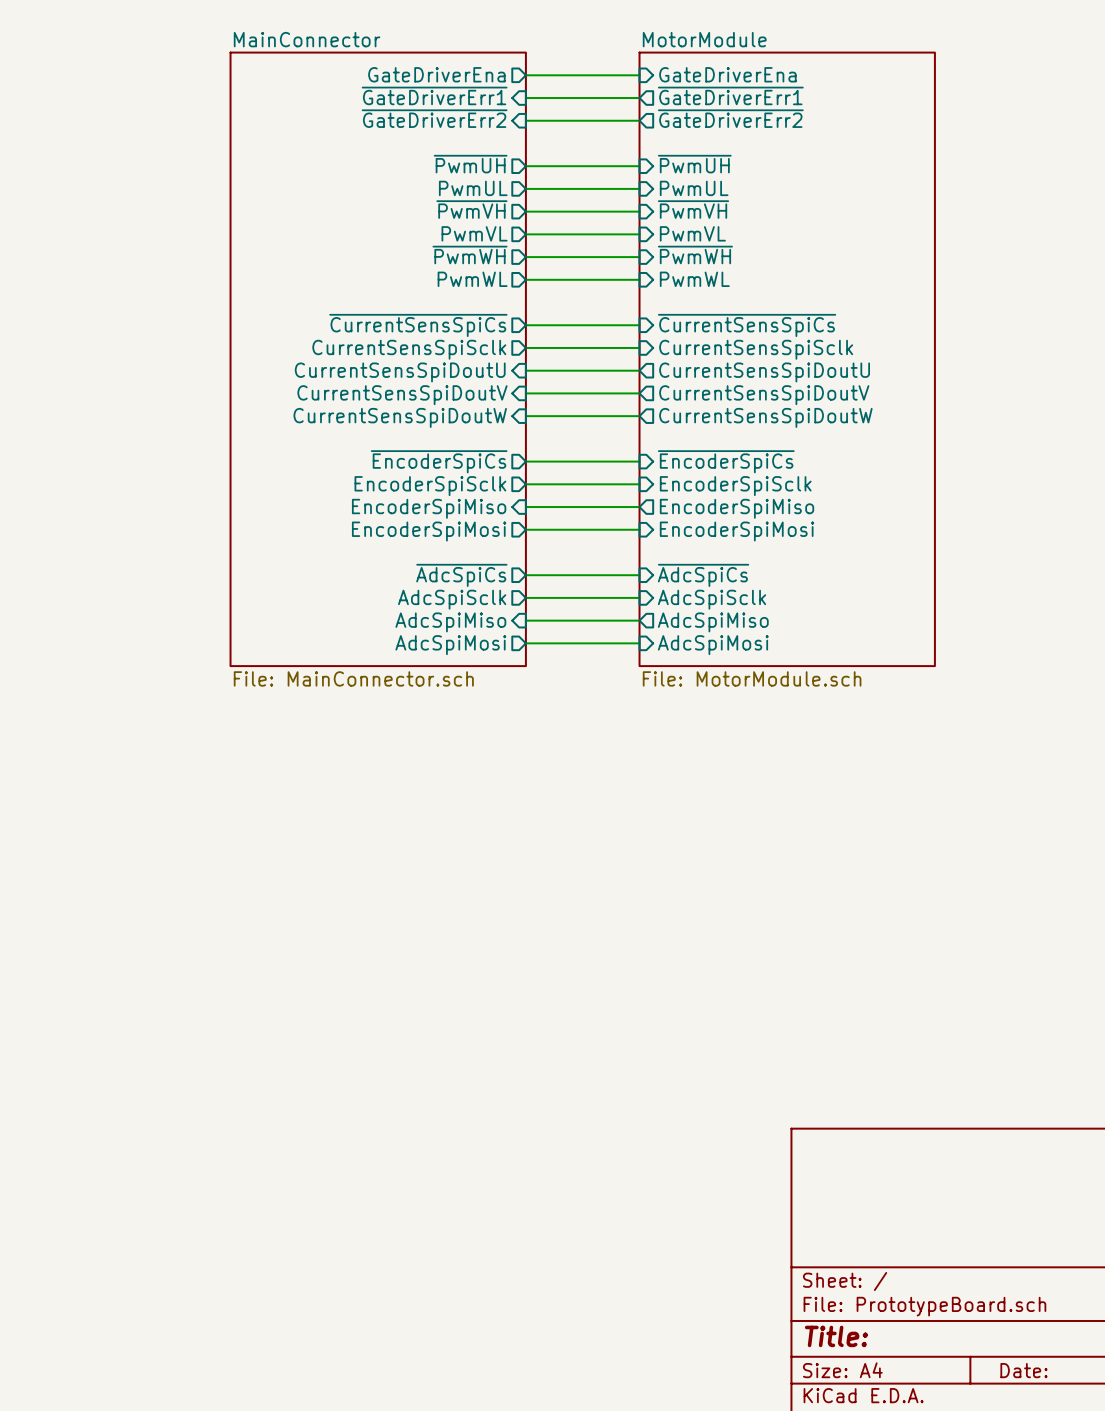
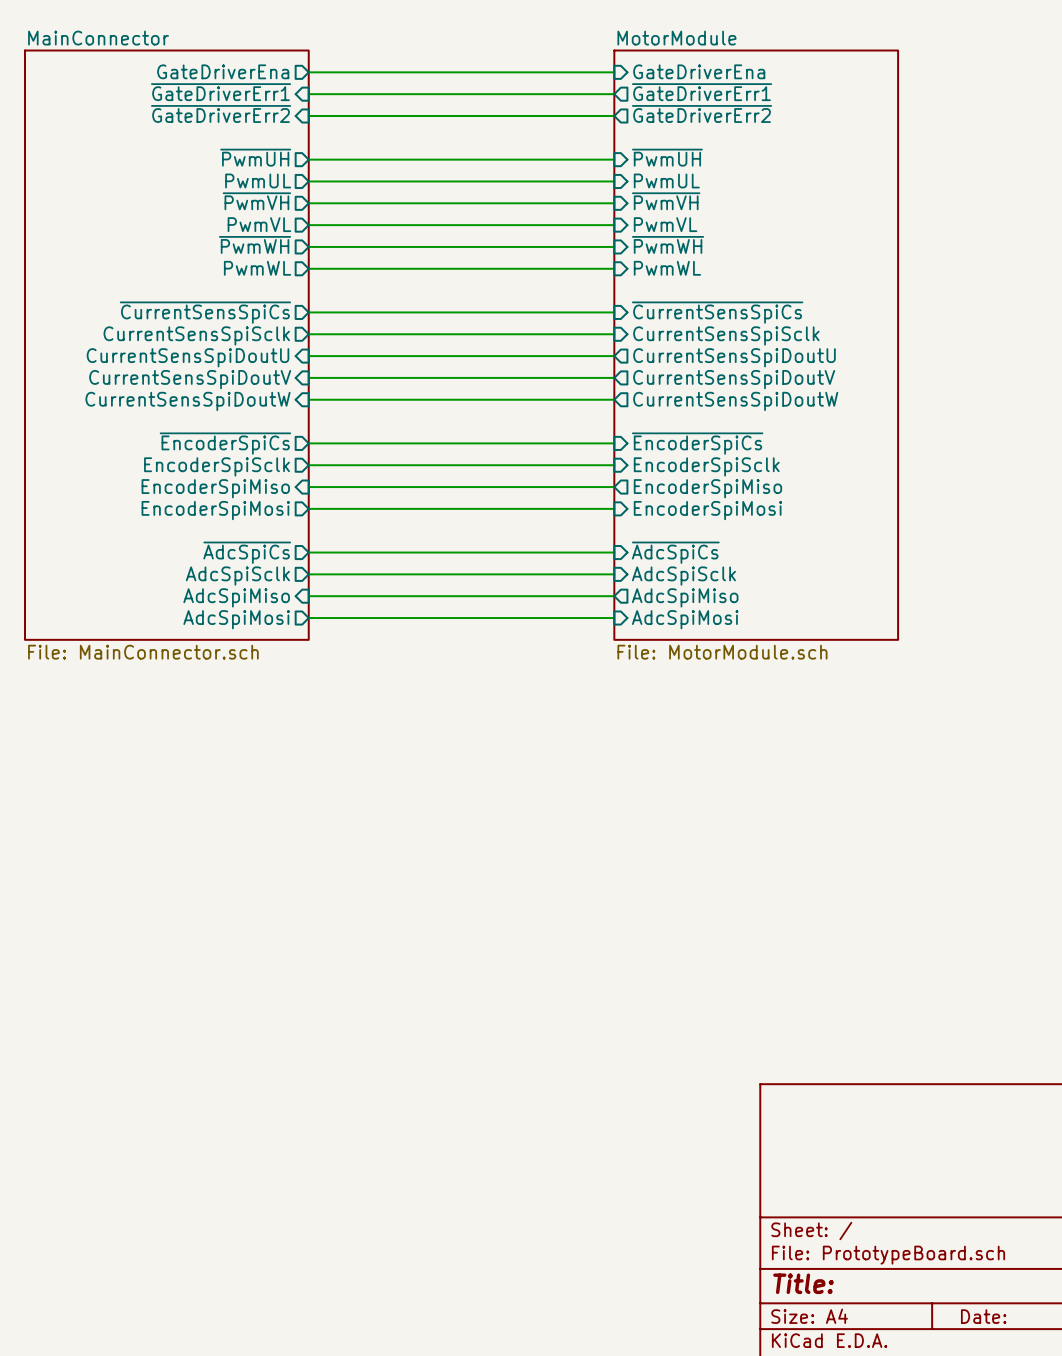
sheet pin position: GateDriverEna (436, 74) -> GateDriverEna (223, 71)
wire: none -> (308, 72) (505, 72)
sheet pin position: ~{GateDriverErr1} (434, 95) -> ~{GateDriverErr1} (221, 92)
wire: none -> (308, 94) (505, 94)
sheet pin position: ~{GateDriverErr2} (434, 118) -> ~{GateDriverErr2} (221, 113)
wire: none -> (308, 115) (505, 115)
sheet pin position: ~{PwmUH} (470, 164) -> ~{PwmUH} (255, 157)
wire: none -> (308, 159) (505, 159)
wire: none -> (308, 181) (505, 181)
sheet pin position: PwmUL (473, 188) -> PwmUL (258, 180)
sheet pin position: ~{PwmVH} (471, 209) -> ~{PwmVH} (256, 201)
wire: none -> (308, 203) (505, 203)
sheet pin position: PwmVL (474, 233) -> PwmVL (259, 224)
wire: none -> (308, 225) (505, 225)
sheet pin position: ~{PwmWH} (470, 255) -> ~{PwmWH} (255, 244)
wire: none -> (308, 246) (505, 246)
wire: none -> (308, 268) (505, 268)
sheet pin position: PwmWL (472, 279) -> PwmWL (257, 268)
wire: none -> (308, 312) (505, 312)
sheet pin position: ~{CurrentSensSpiCs} (418, 325) -> ~{CurrentSensSpiCs} (205, 312)
wire: none -> (308, 334) (505, 334)
sheet pin position: CurrentSensSpiSclk (409, 349) -> CurrentSensSpiSclk (196, 335)
sheet MainConnector position: (378, 359) -> (166, 345)
wire: none -> (308, 356) (505, 356)
sheet pin position: CurrentSensSpiDoutU (400, 372) -> CurrentSensSpiDoutU (187, 357)
wire: none -> (308, 377) (505, 377)
sheet pin position: CurrentSensSpiDoutV (402, 395) -> CurrentSensSpiDoutV (190, 379)
wire: none -> (308, 399) (505, 399)
sheet pin position: CurrentSensSpiDoutW (400, 417) -> CurrentSensSpiDoutW (187, 401)
wire: none -> (308, 443) (505, 443)
sheet pin position: ~{EncoderSpiCs} (439, 461) -> ~{EncoderSpiCs} (225, 443)
wire: none -> (308, 465) (505, 465)
sheet pin position: EncoderSpiSclk (430, 486) -> EncoderSpiSclk (216, 466)
wire: none -> (308, 487) (505, 487)
sheet pin position: EncoderSpiMiso (429, 508) -> EncoderSpiMiso (215, 488)
wire: none -> (308, 508) (505, 508)
sheet pin position: EncoderSpiMosi (429, 531) -> EncoderSpiMosi (215, 510)
wire: none -> (308, 552) (505, 552)
sheet pin position: ~{AdcSpiCs} (461, 575) -> ~{AdcSpiCs} (247, 552)
wire: none -> (308, 574) (505, 574)
sheet pin position: AdcSpiSclk (452, 599) -> AdcSpiSclk (237, 576)
wire: none -> (308, 596) (505, 596)
sheet pin position: AdcSpiMiso (450, 622) -> AdcSpiMiso (236, 597)
wire: none -> (308, 618) (505, 618)
sheet pin position: AdcSpiMosi (450, 645) -> AdcSpiMosi (236, 619)

